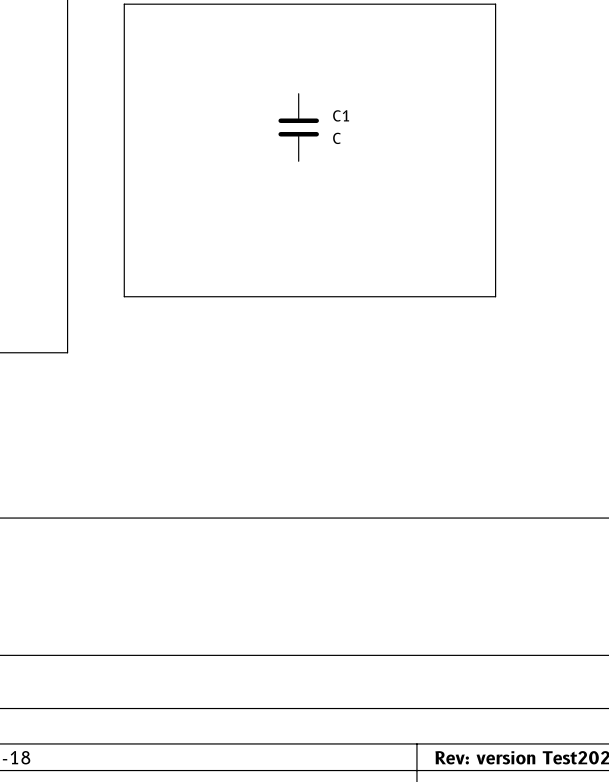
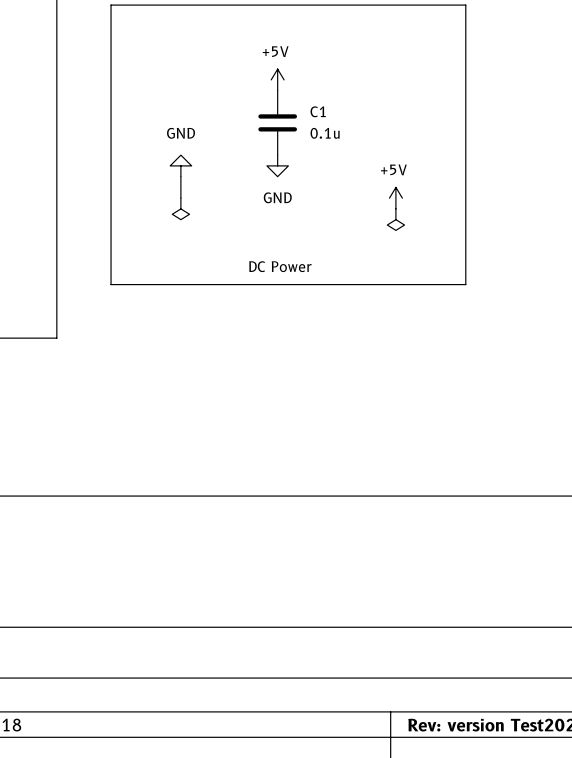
power symbol: none -> +5V (277, 79)
C1 value: C (336, 138) -> 0.1u (325, 133)
power symbol: none -> GND (180, 165)
power symbol: none -> GND (277, 165)
wire: none -> (180, 176) (180, 198)
power symbol: none -> +5V (395, 198)
power symbol: none -> (180, 208)
power symbol: none -> (395, 219)
text: none -> DC Power (280, 266)

